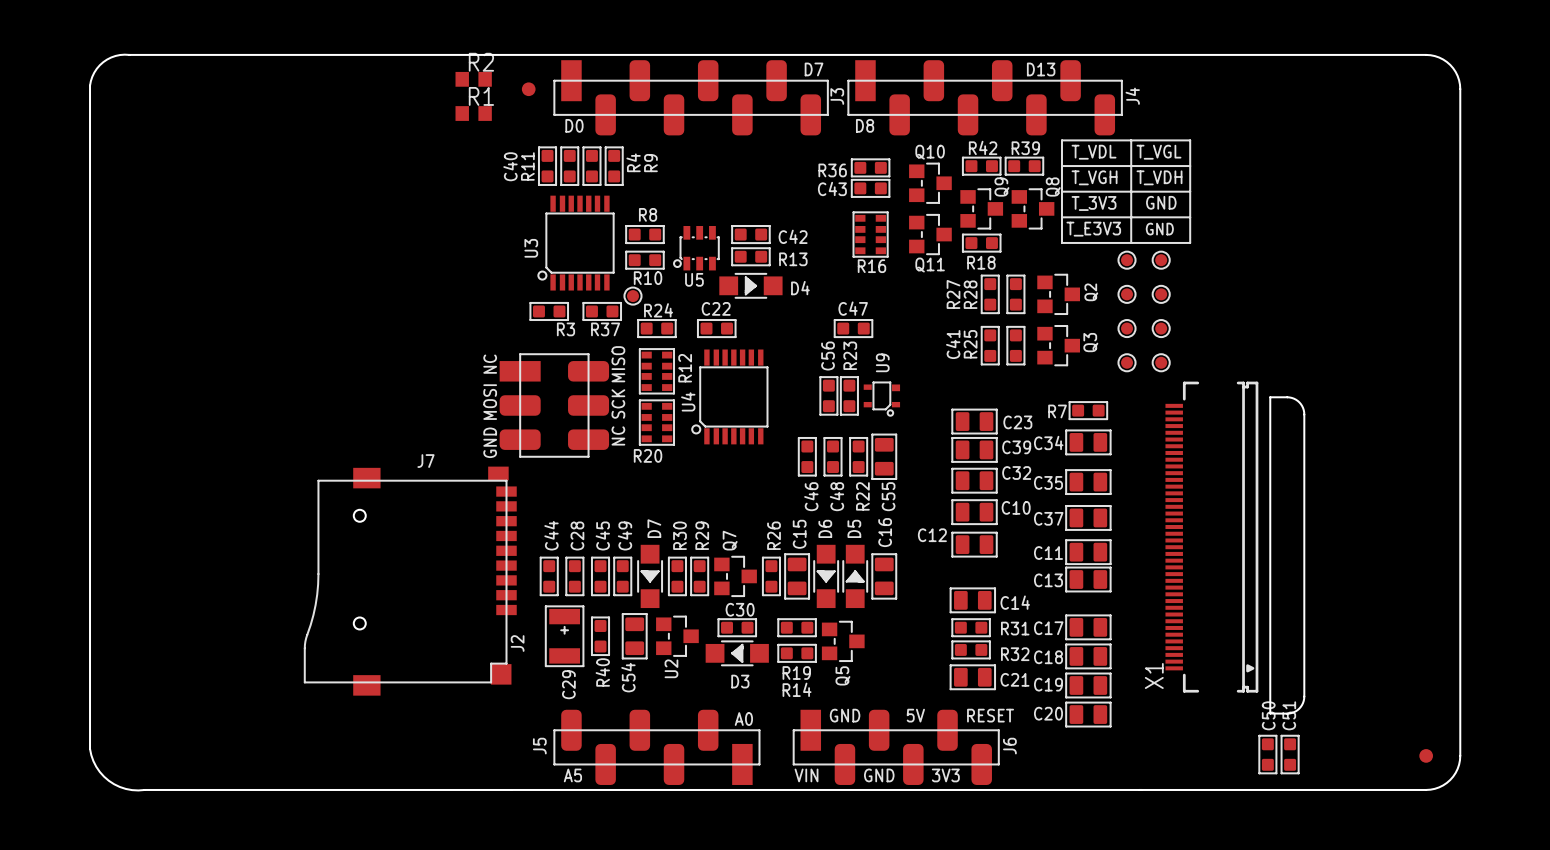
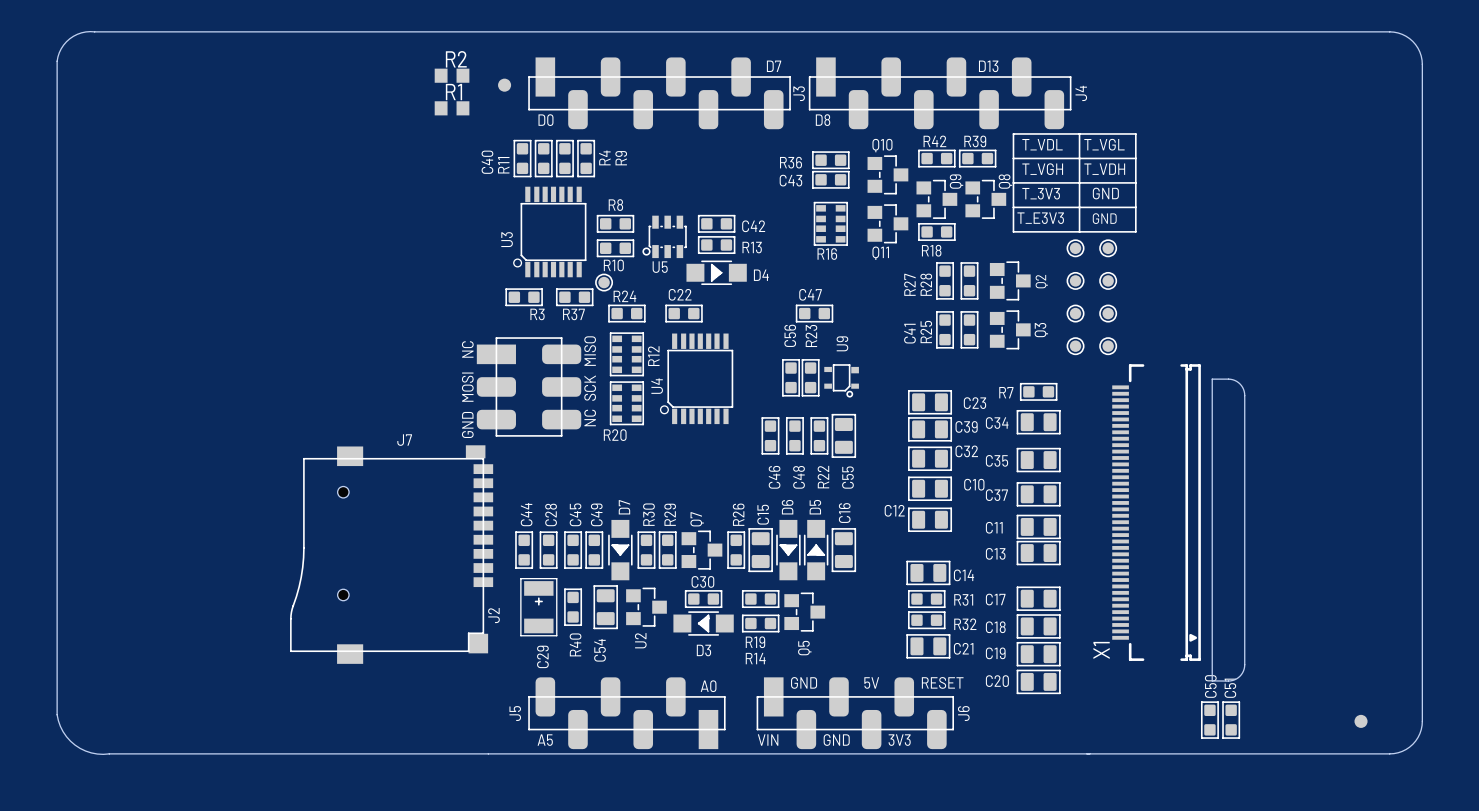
board edge: (144, 789) (125, 788) (108, 780) (96, 766) (90, 748) (90, 85) (94, 72) (103, 62) (115, 55) (124, 54) (1426, 54) (1443, 59) (1455, 72) (1460, 89) (1460, 755) (1457, 768) (1450, 779) (1439, 787) (1426, 789) -> (138, 753) (97, 754) (80, 748) (70, 741) (63, 731) (57, 714) (57, 61) (61, 48) (69, 38) (81, 32) (90, 31) (1389, 31) (1406, 36) (1417, 48) (1422, 64) (1422, 721) (1417, 737) (1406, 749) (1393, 753) (1360, 753)

